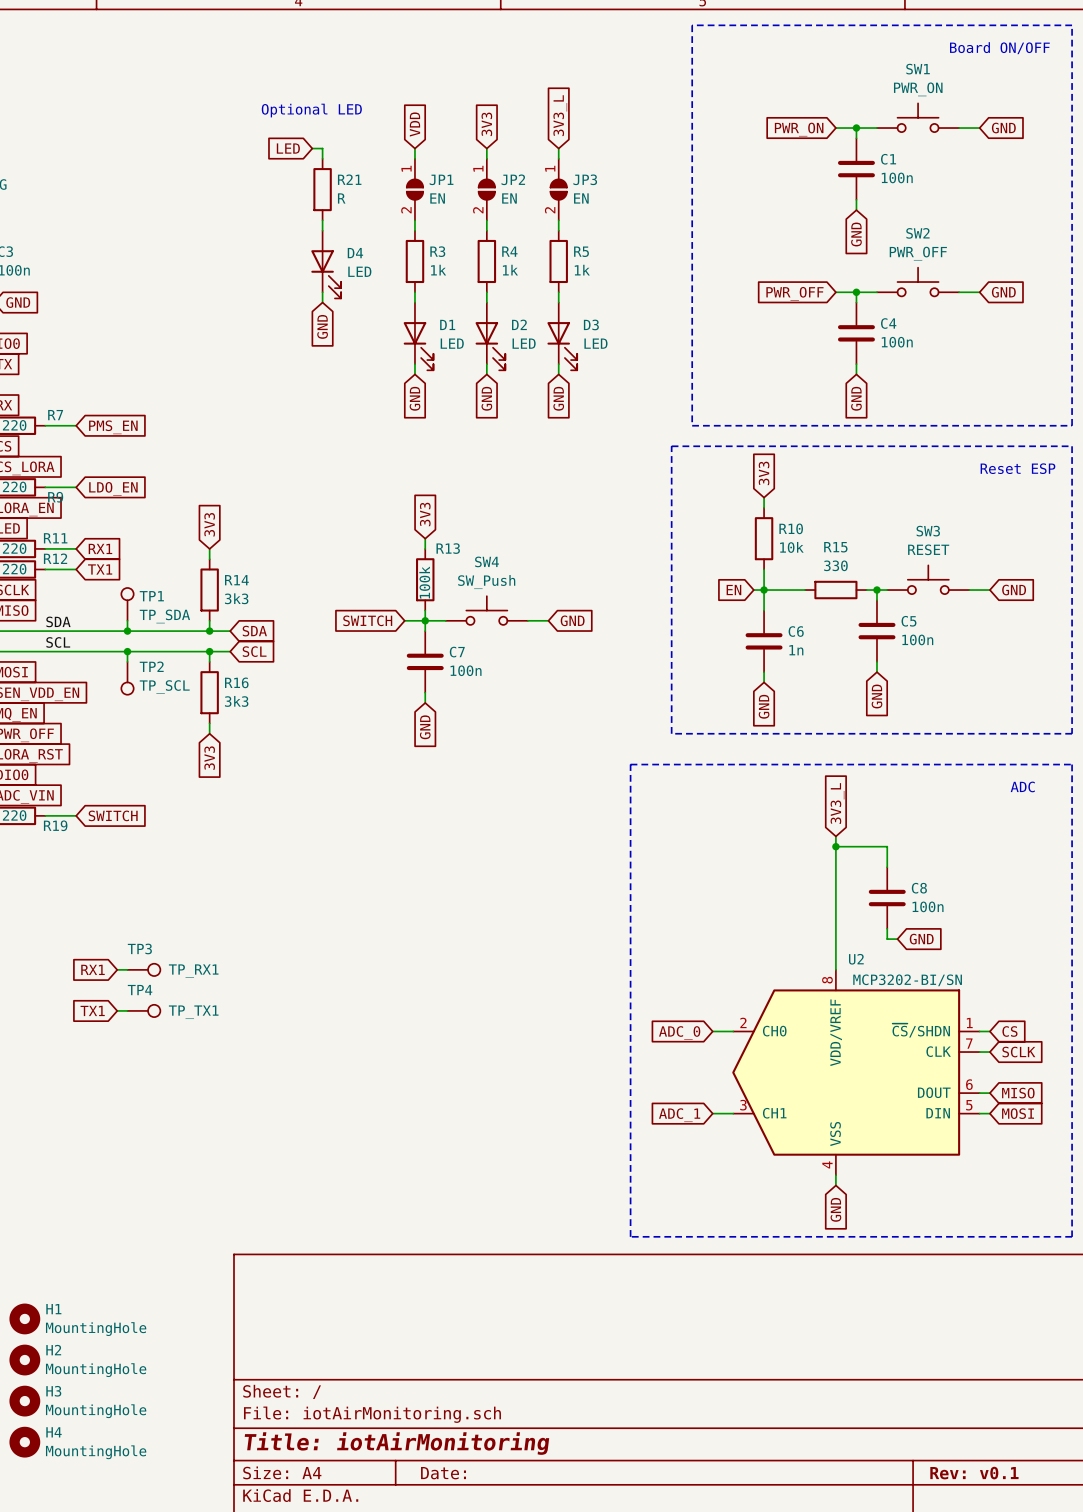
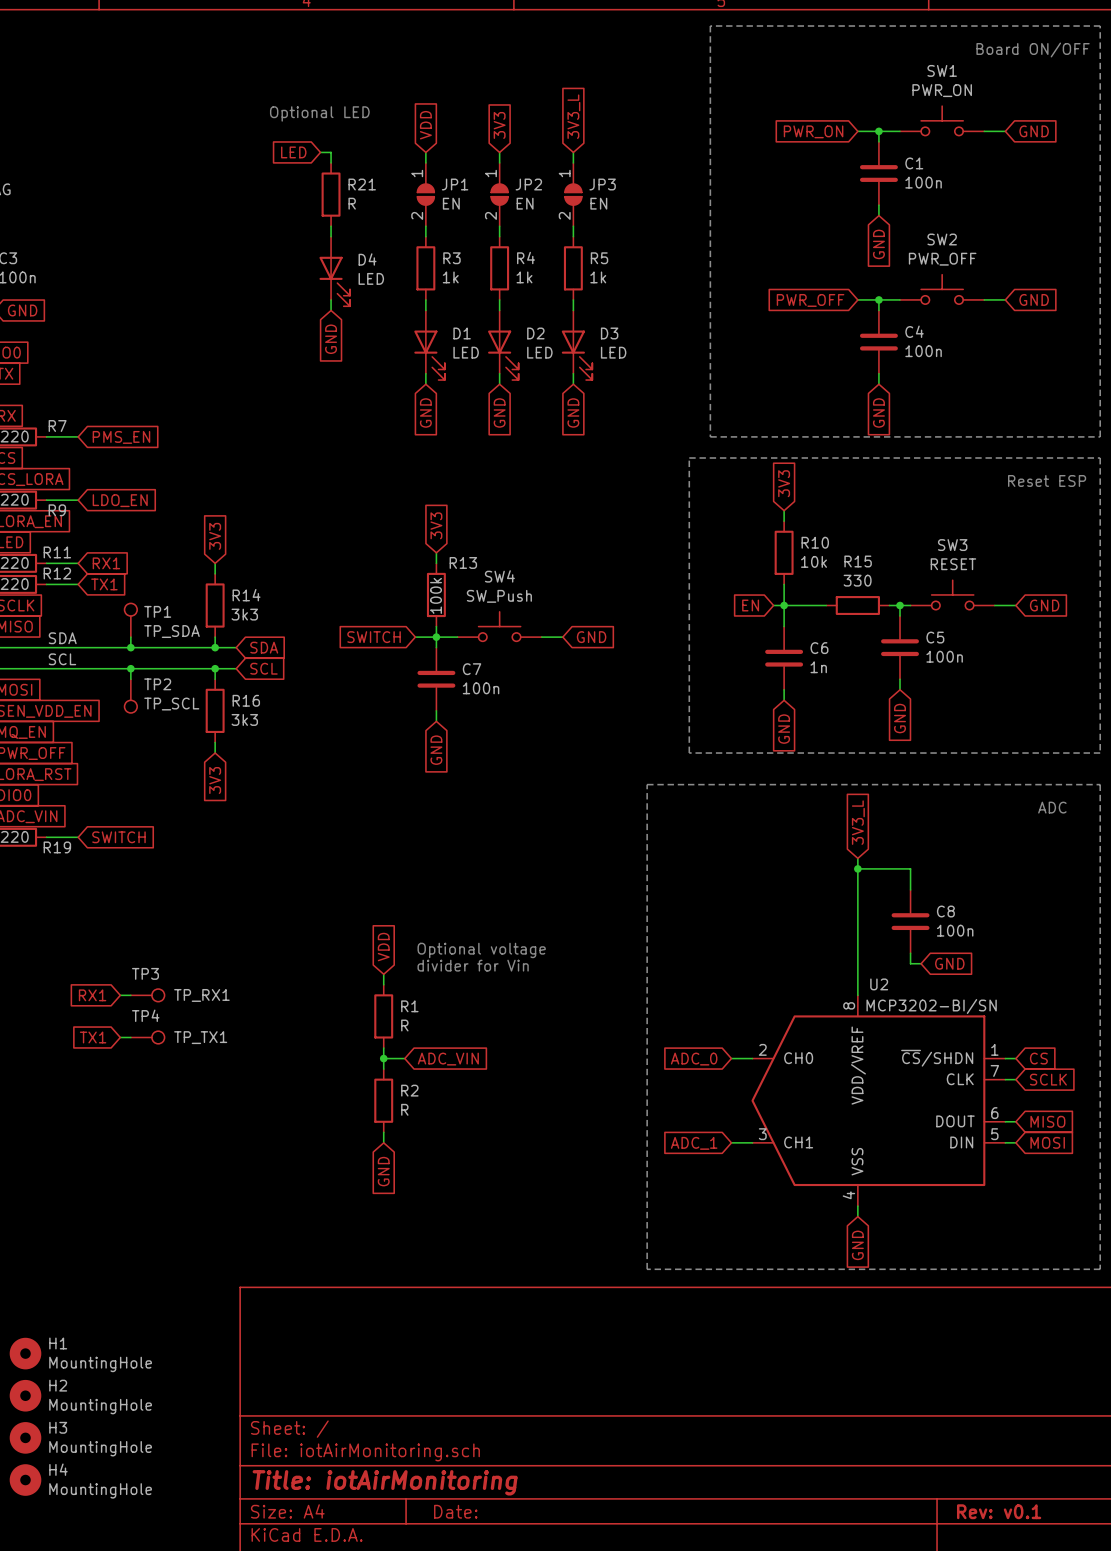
global label: none -> VDD (383, 947)
text: none -> Optional voltage (481, 950)
text: none -> divider for Vin (473, 965)
wire: none -> (383, 974) (383, 984)
R1: none -> R (383, 1016)
wire: none -> (383, 1048) (383, 1069)
wire: none -> (383, 1058) (404, 1058)
junction: none -> (383, 1058)
global label: none -> ADC_VIN (448, 1059)
R2: none -> R (383, 1100)
wire: none -> (383, 1132) (383, 1142)
global label: none -> GND (383, 1171)

